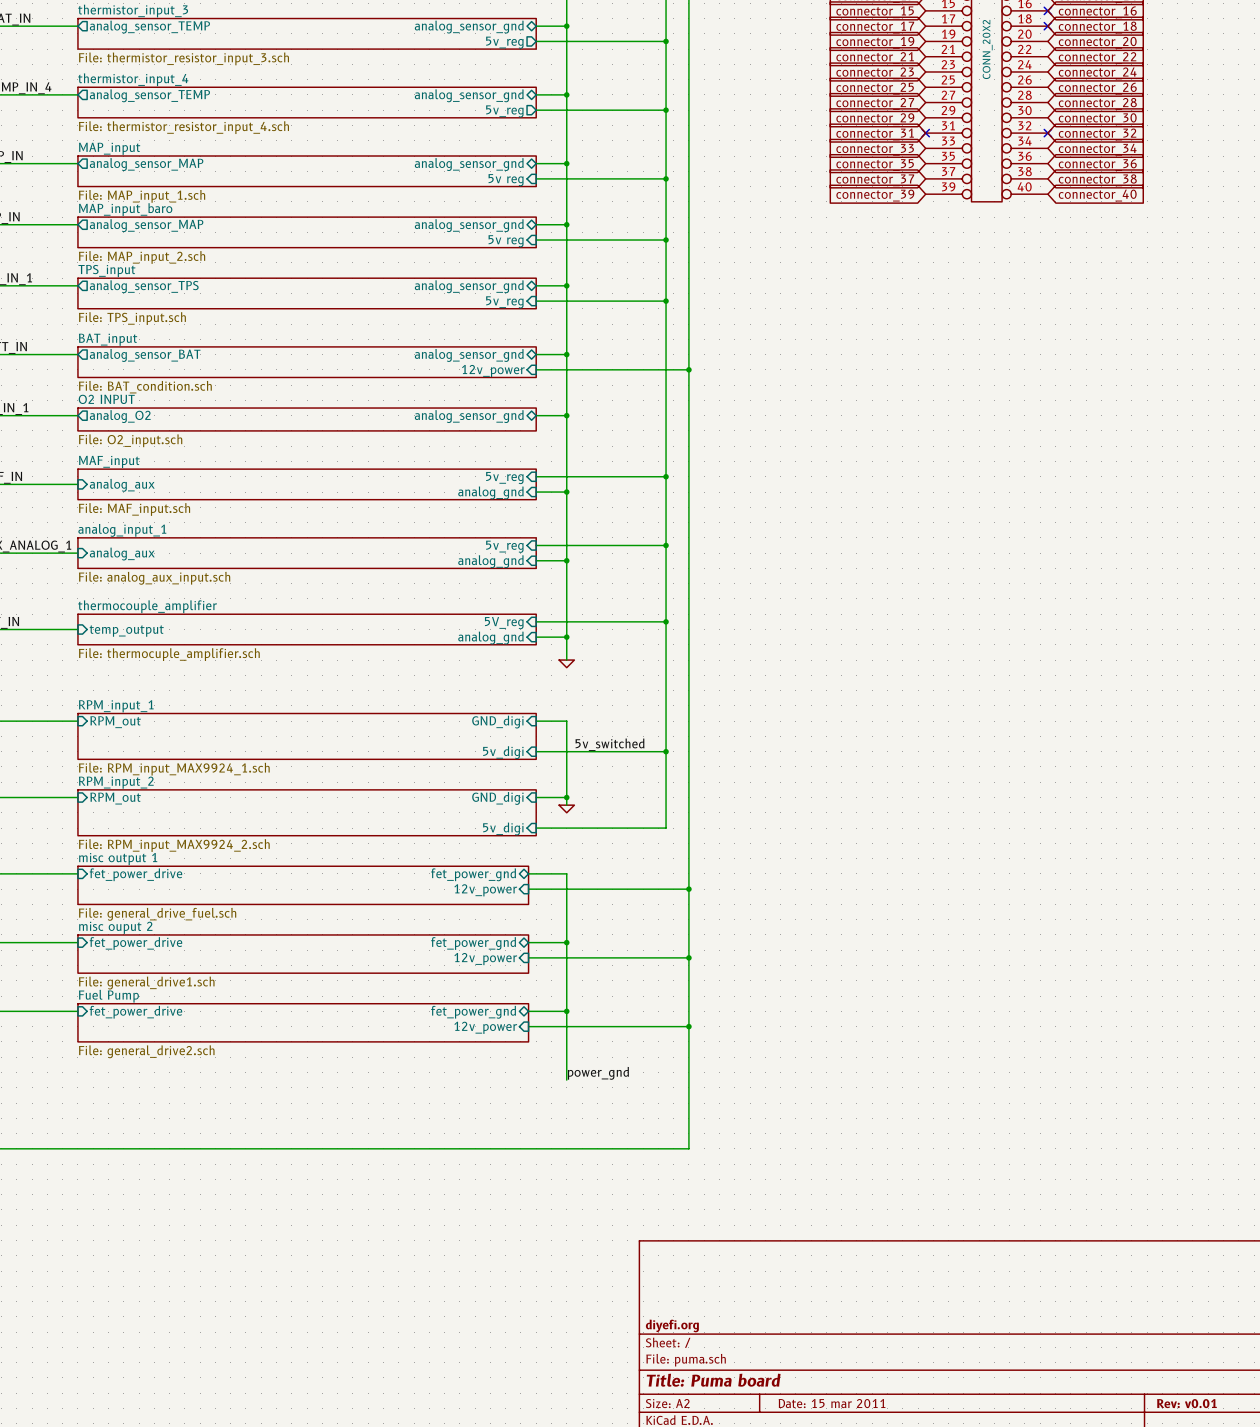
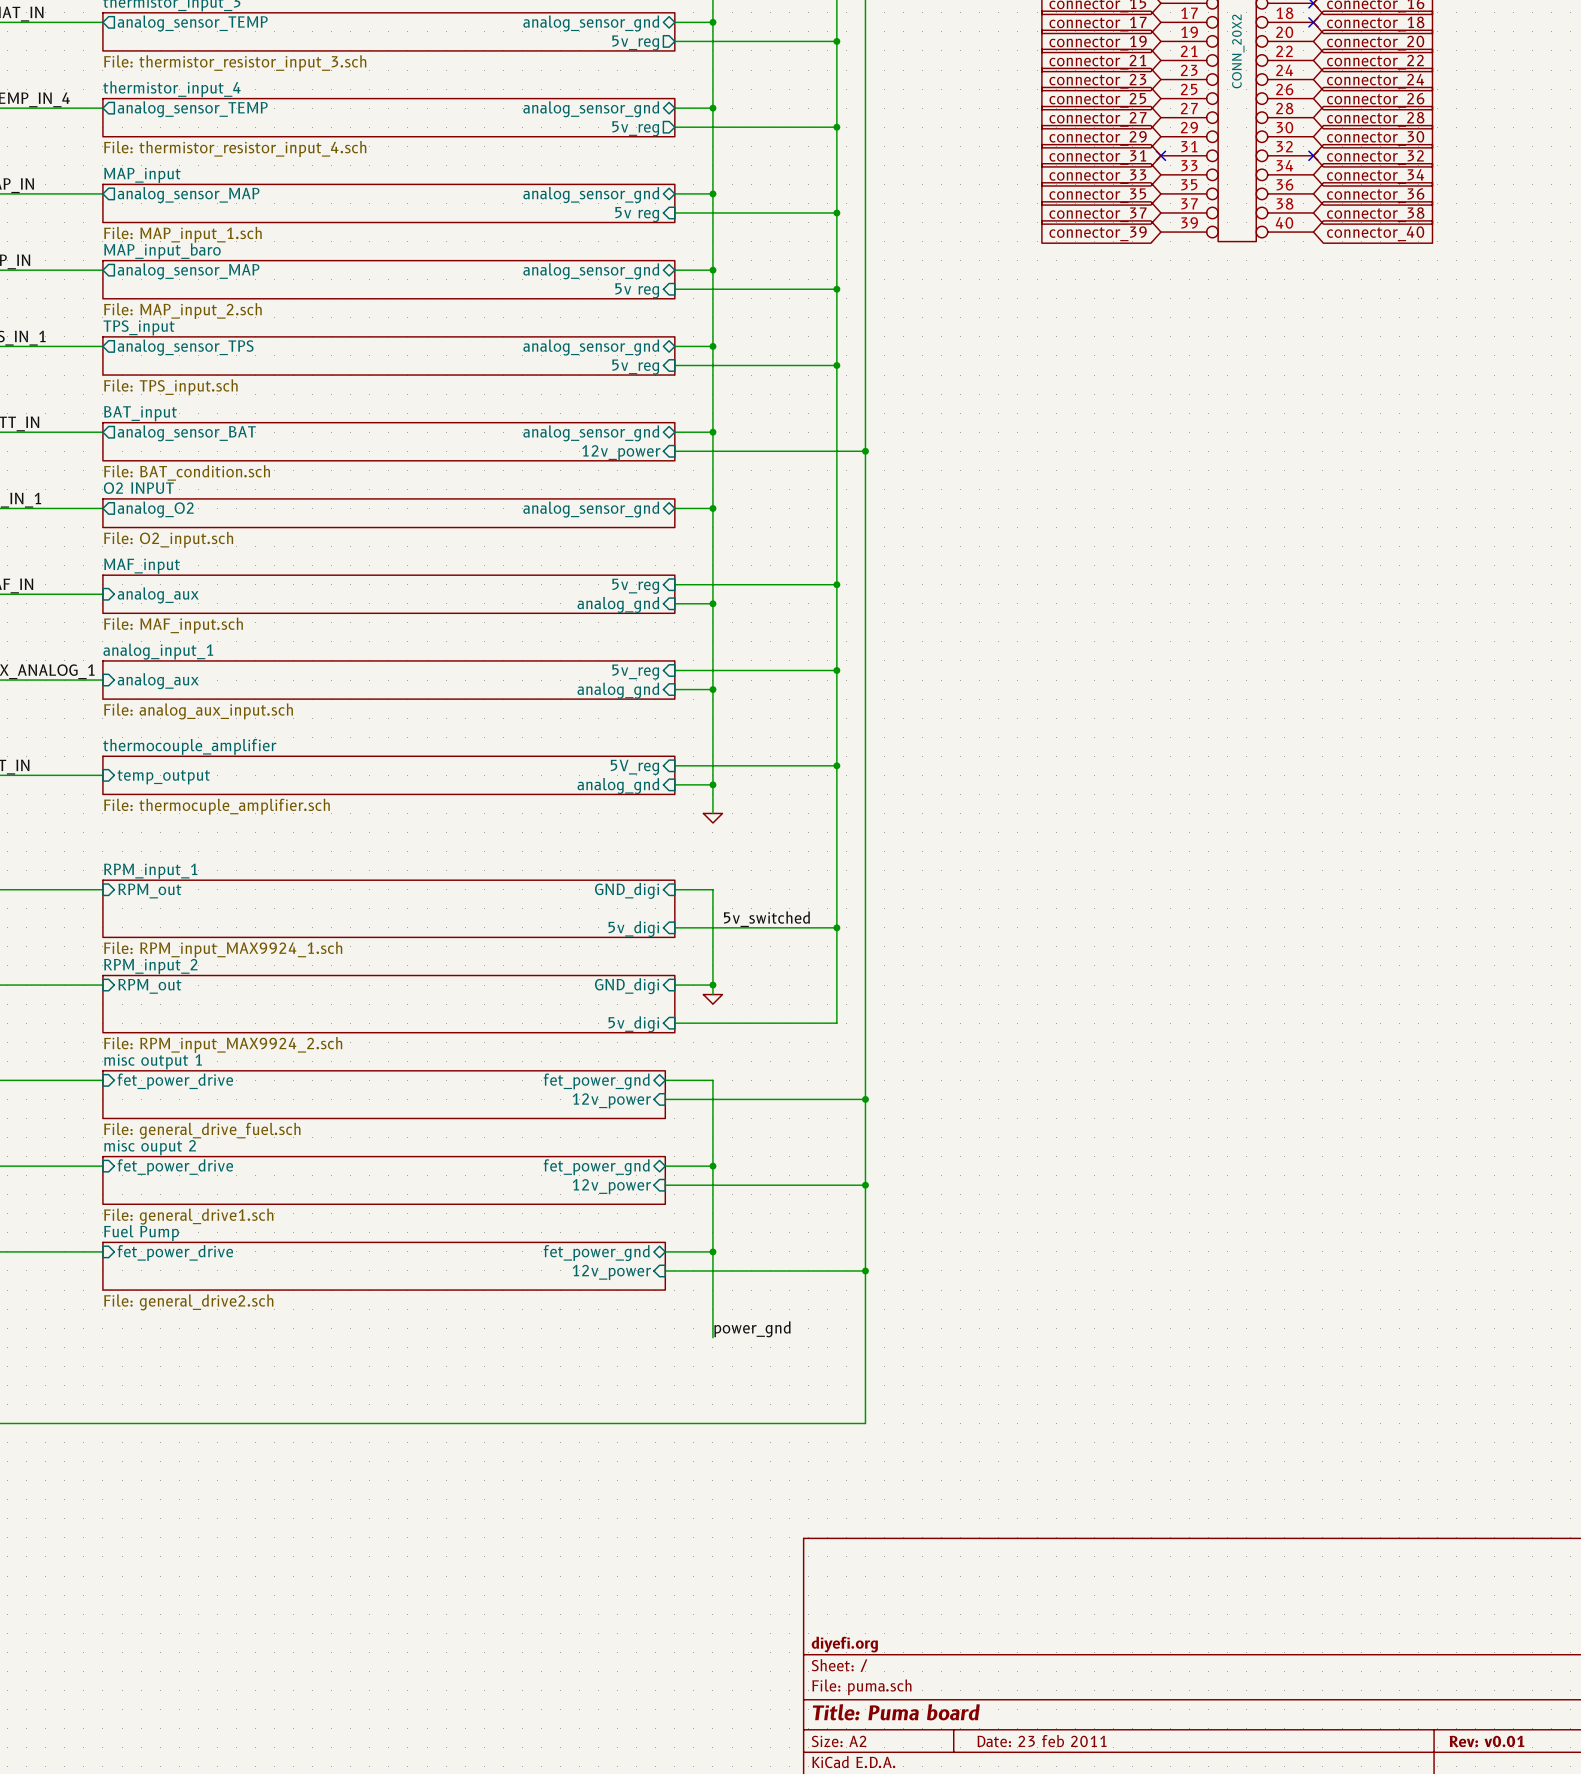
title block: Date: 15 mar 2011 (832, 1403) -> Date: 23 feb 2011 (1042, 1741)

